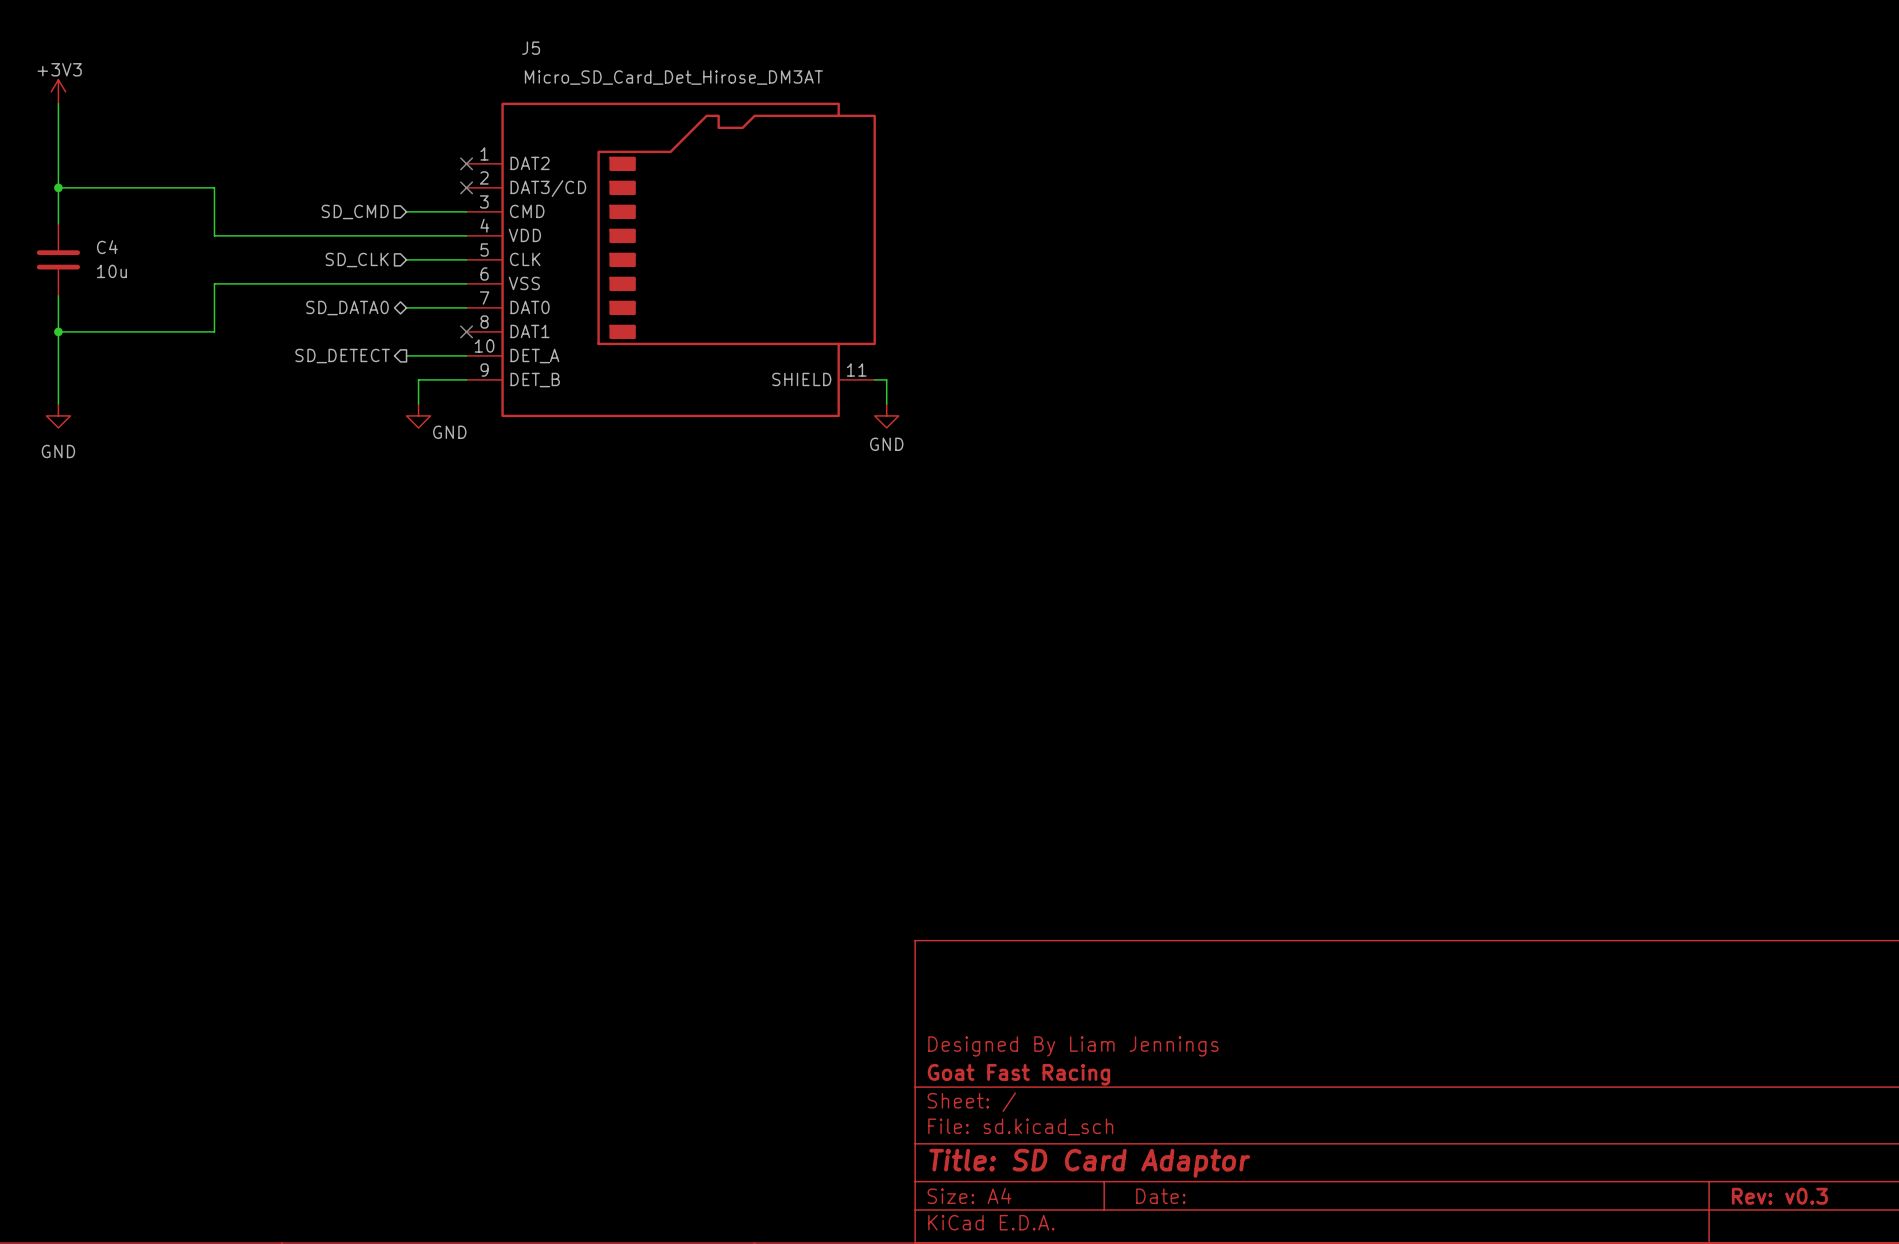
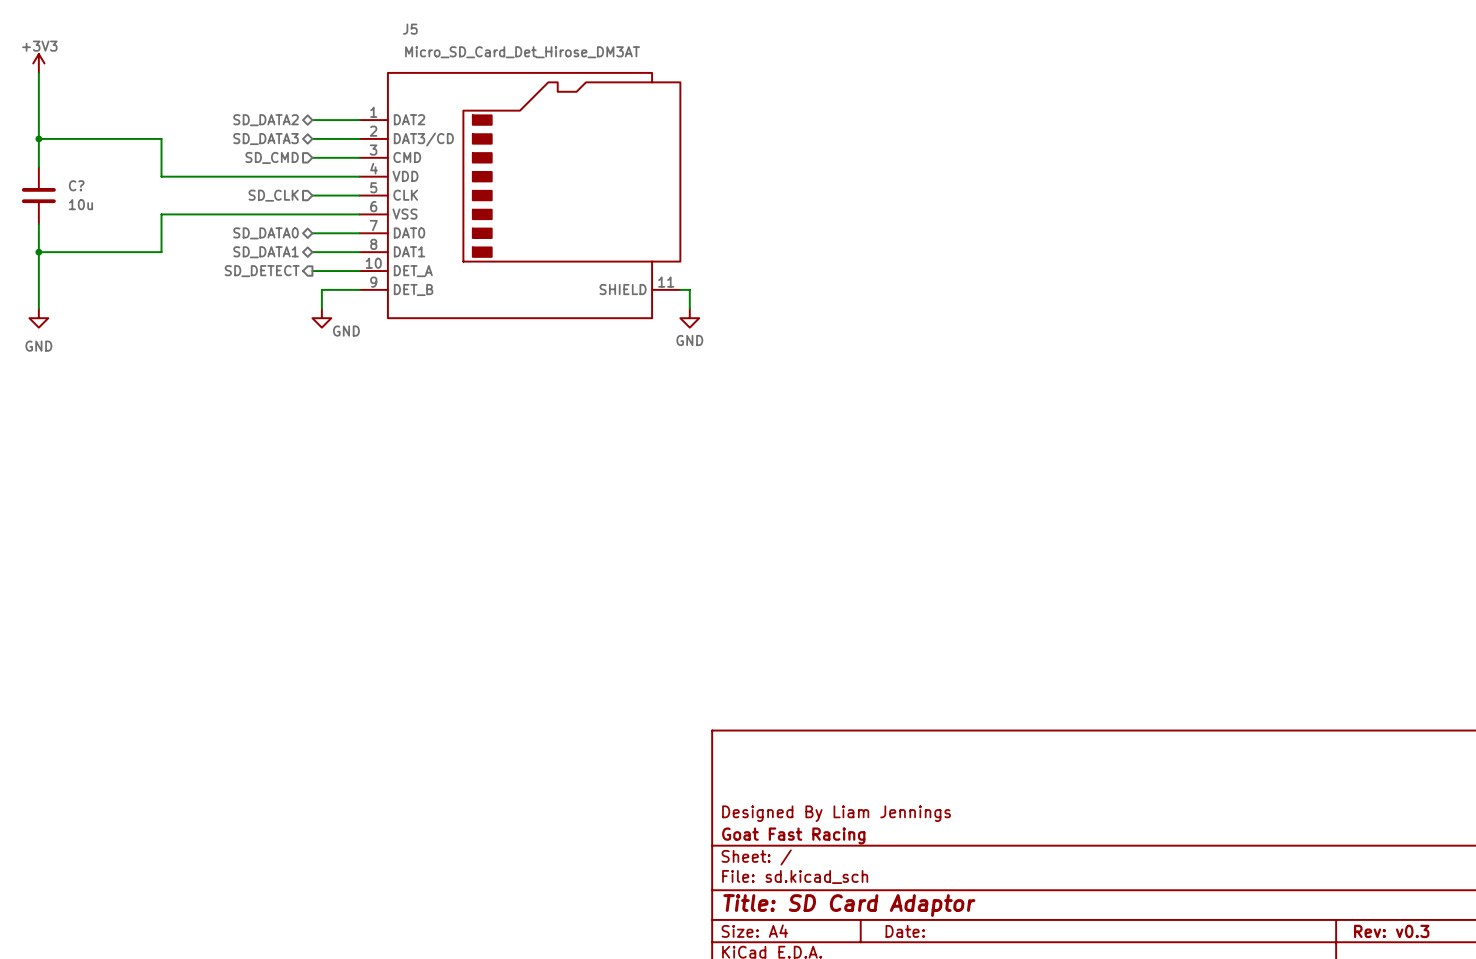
hierarchical label: none -> SD_DATA2 (266, 120)
wire: none -> (312, 120) (359, 120)
no-connect mark: (466, 163) -> none
hierarchical label: none -> SD_DATA3 (266, 139)
wire: none -> (312, 138) (359, 138)
no-connect mark: (466, 187) -> none
C4 name: C4 (107, 247) -> C? (76, 185)
wire: none -> (312, 252) (359, 252)
no-connect mark: (466, 331) -> none
hierarchical label: none -> SD_DATA1 (266, 252)

